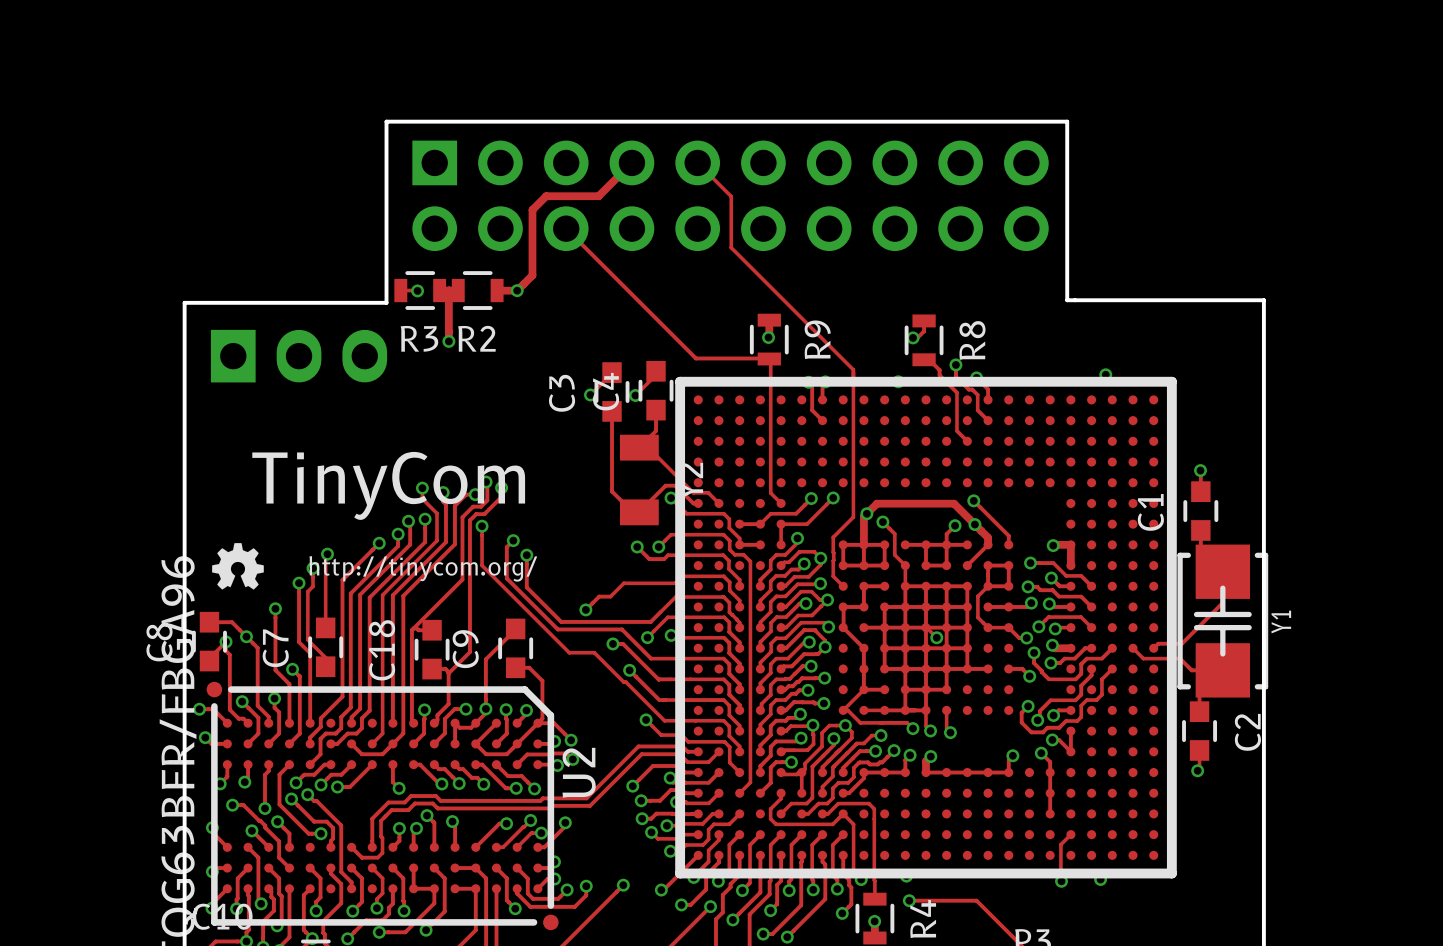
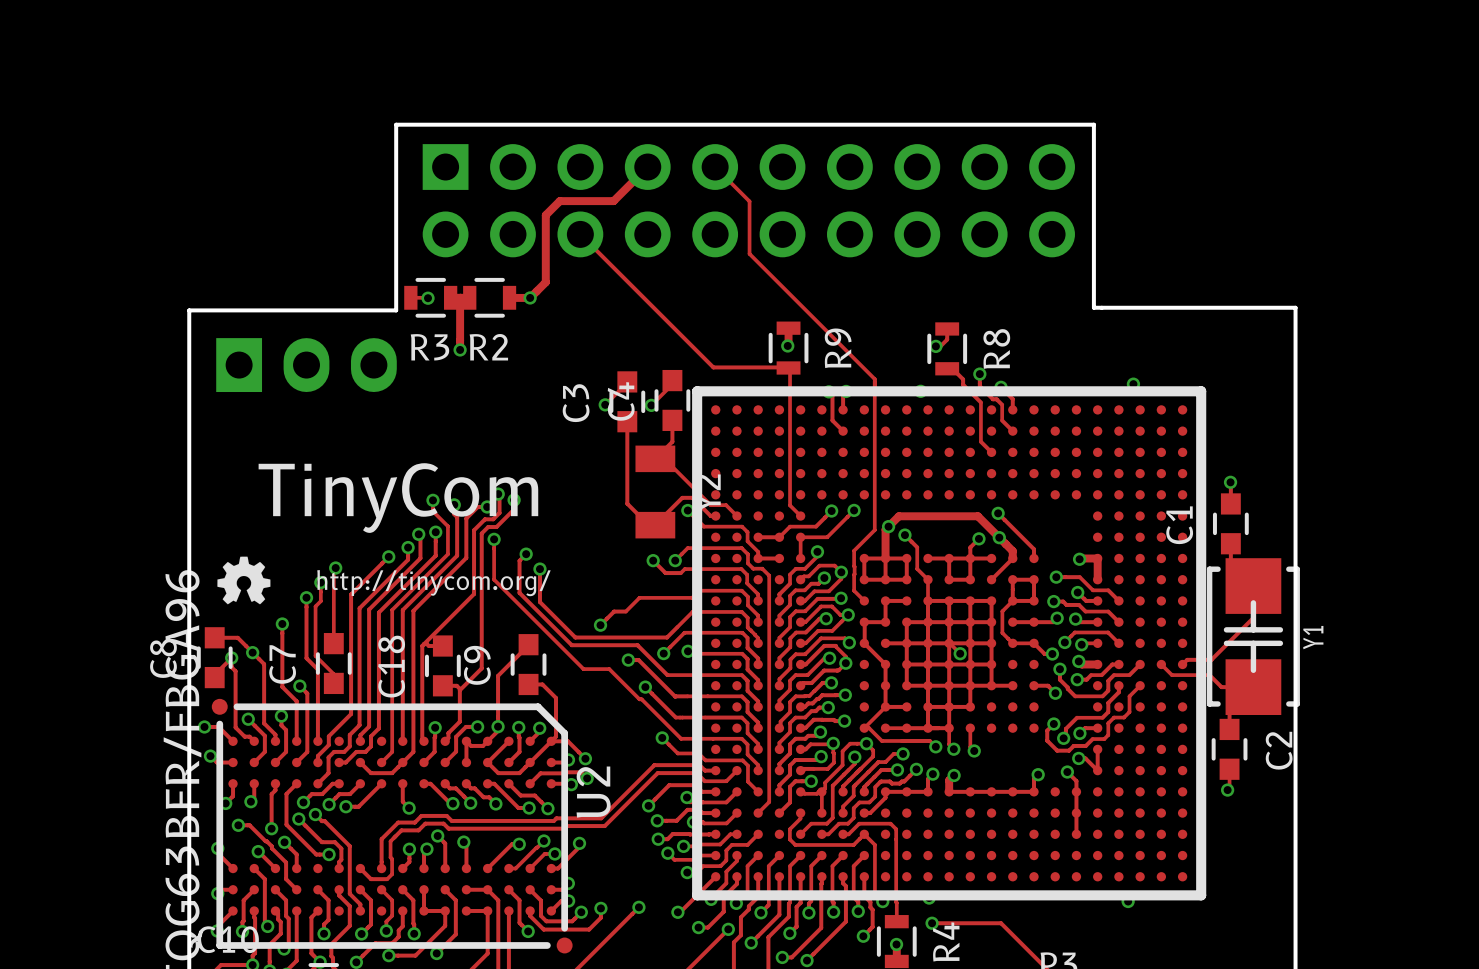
track: (1070, 834) (1060, 844) (1061, 881) -> none
via: (1061, 881) -> none

